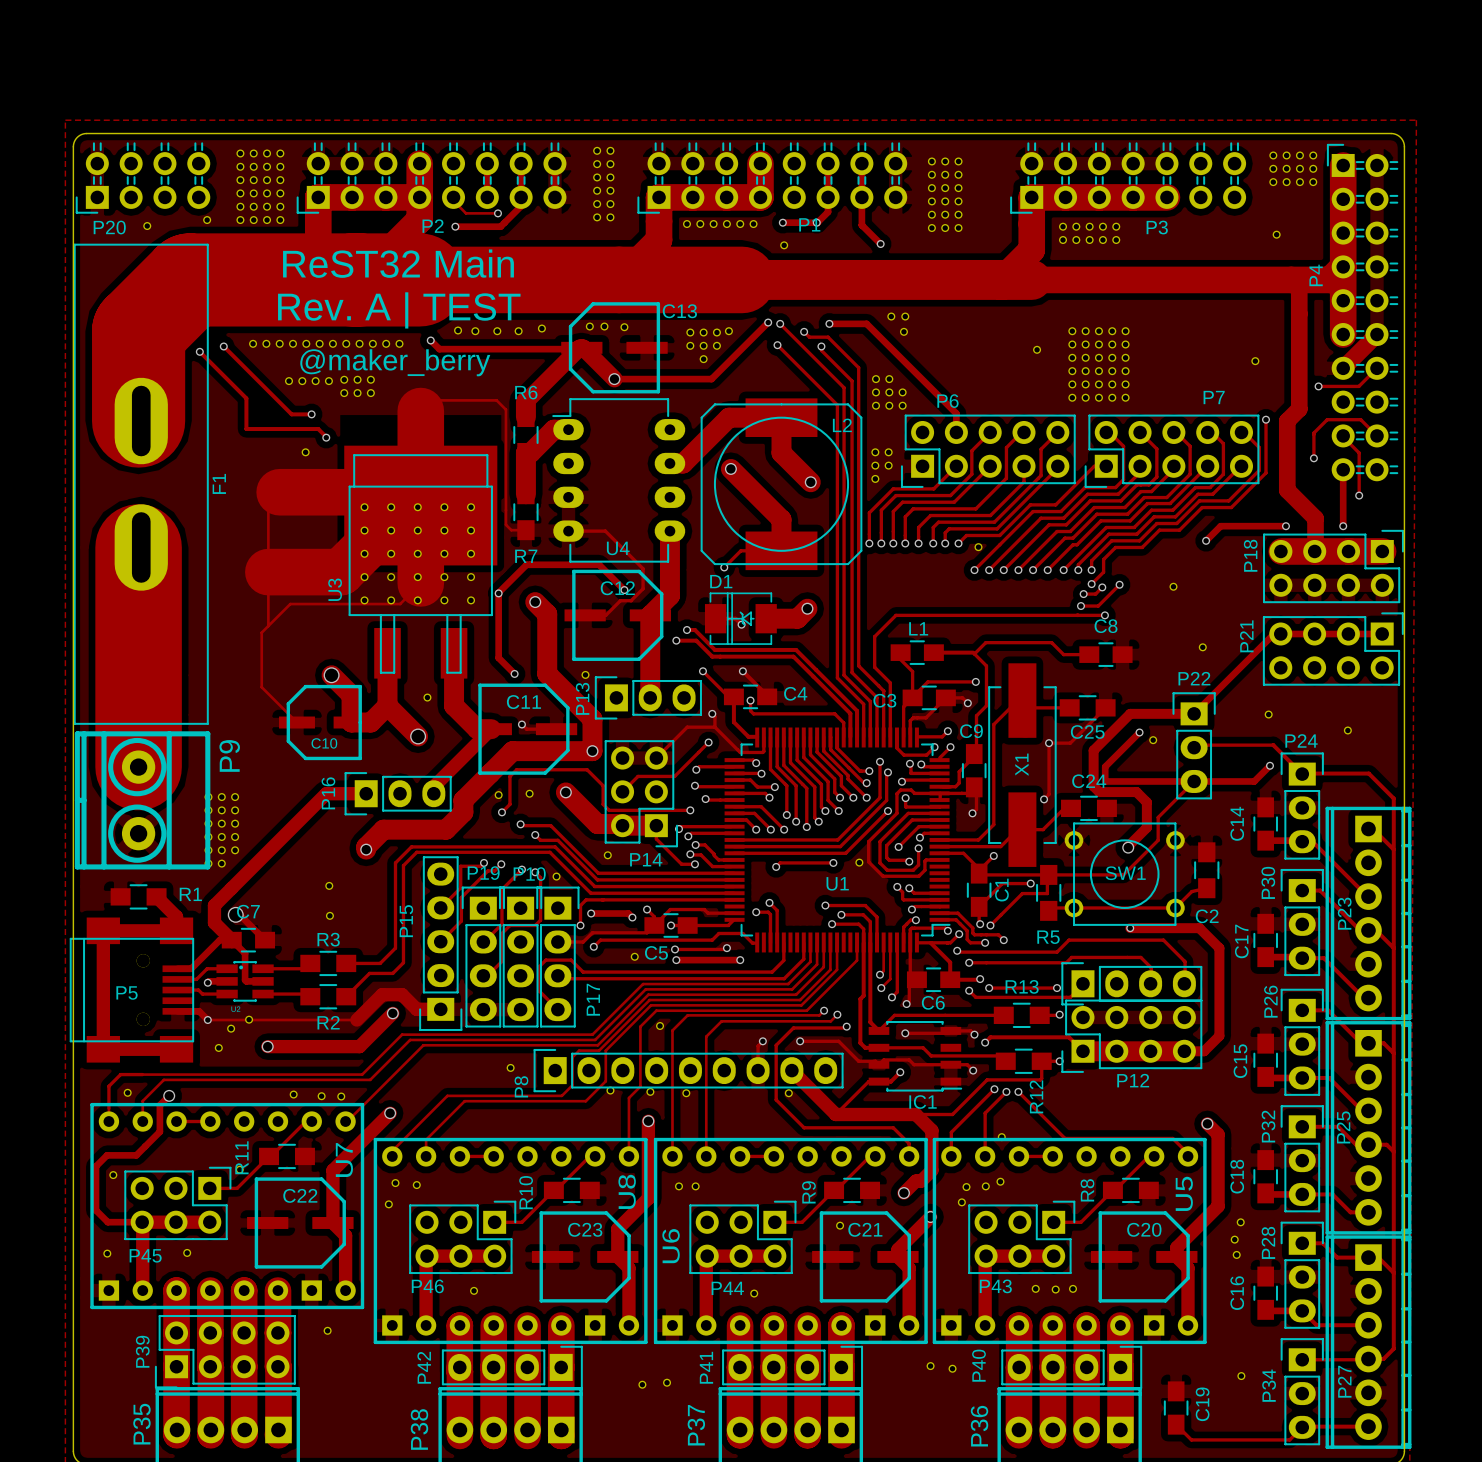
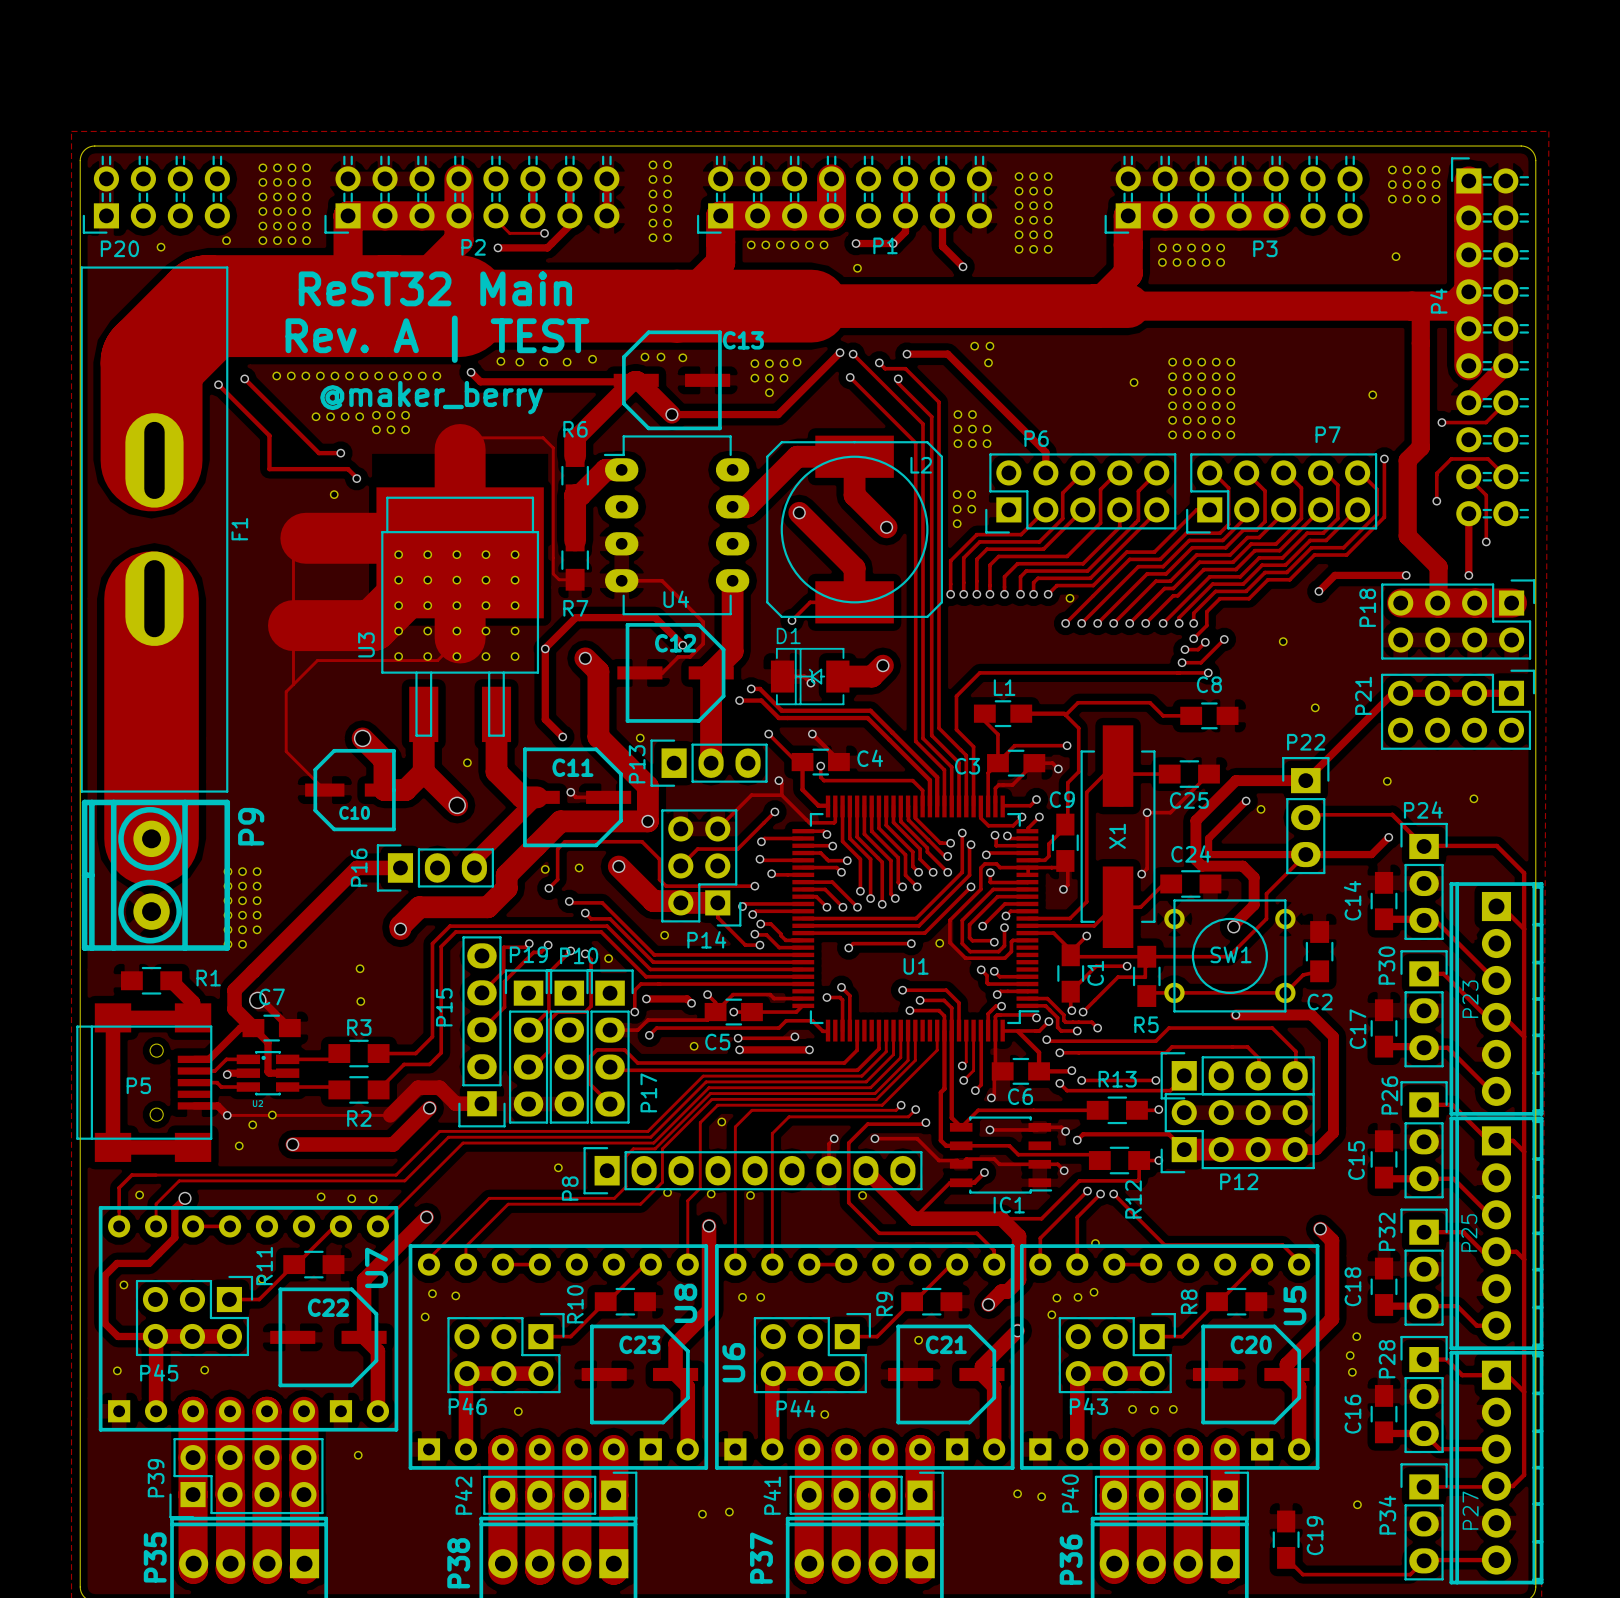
P5 footprint: [69, 917, 195, 1063] -> [76, 1003, 213, 1162]

